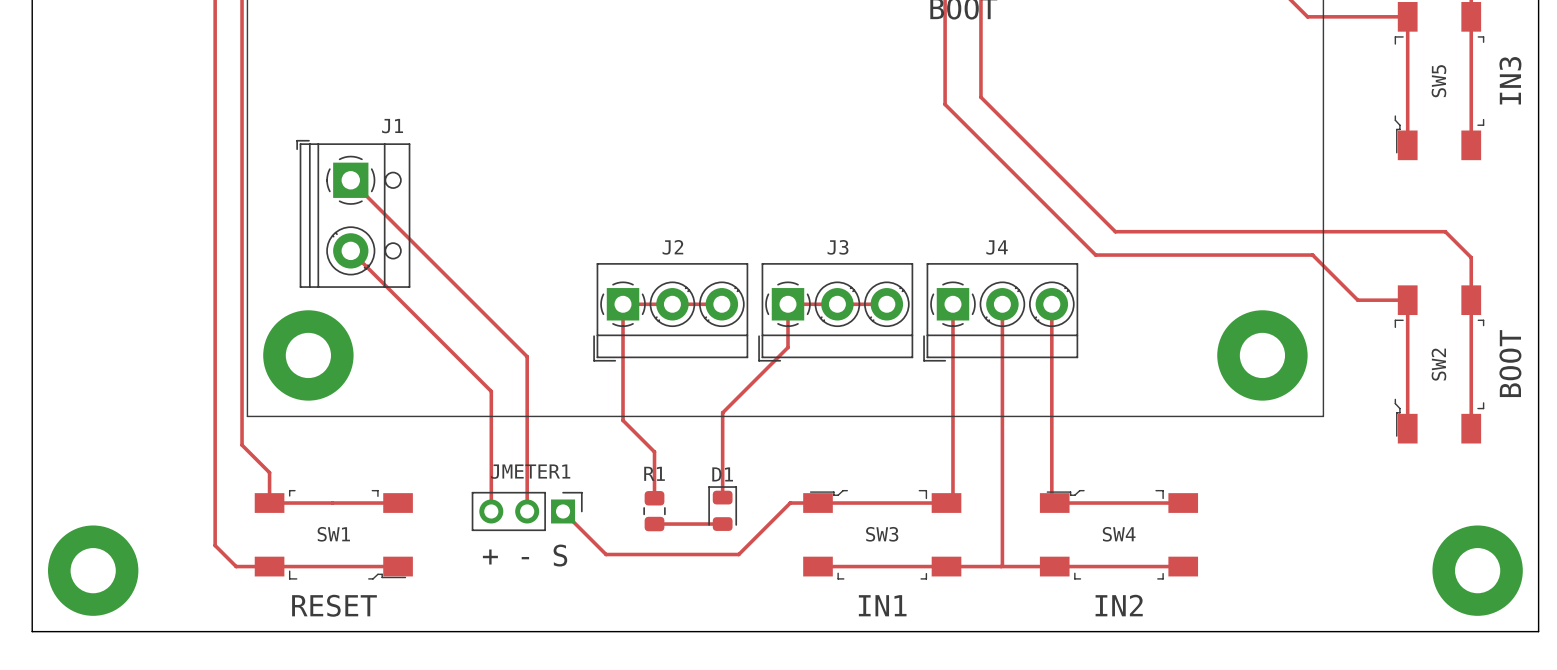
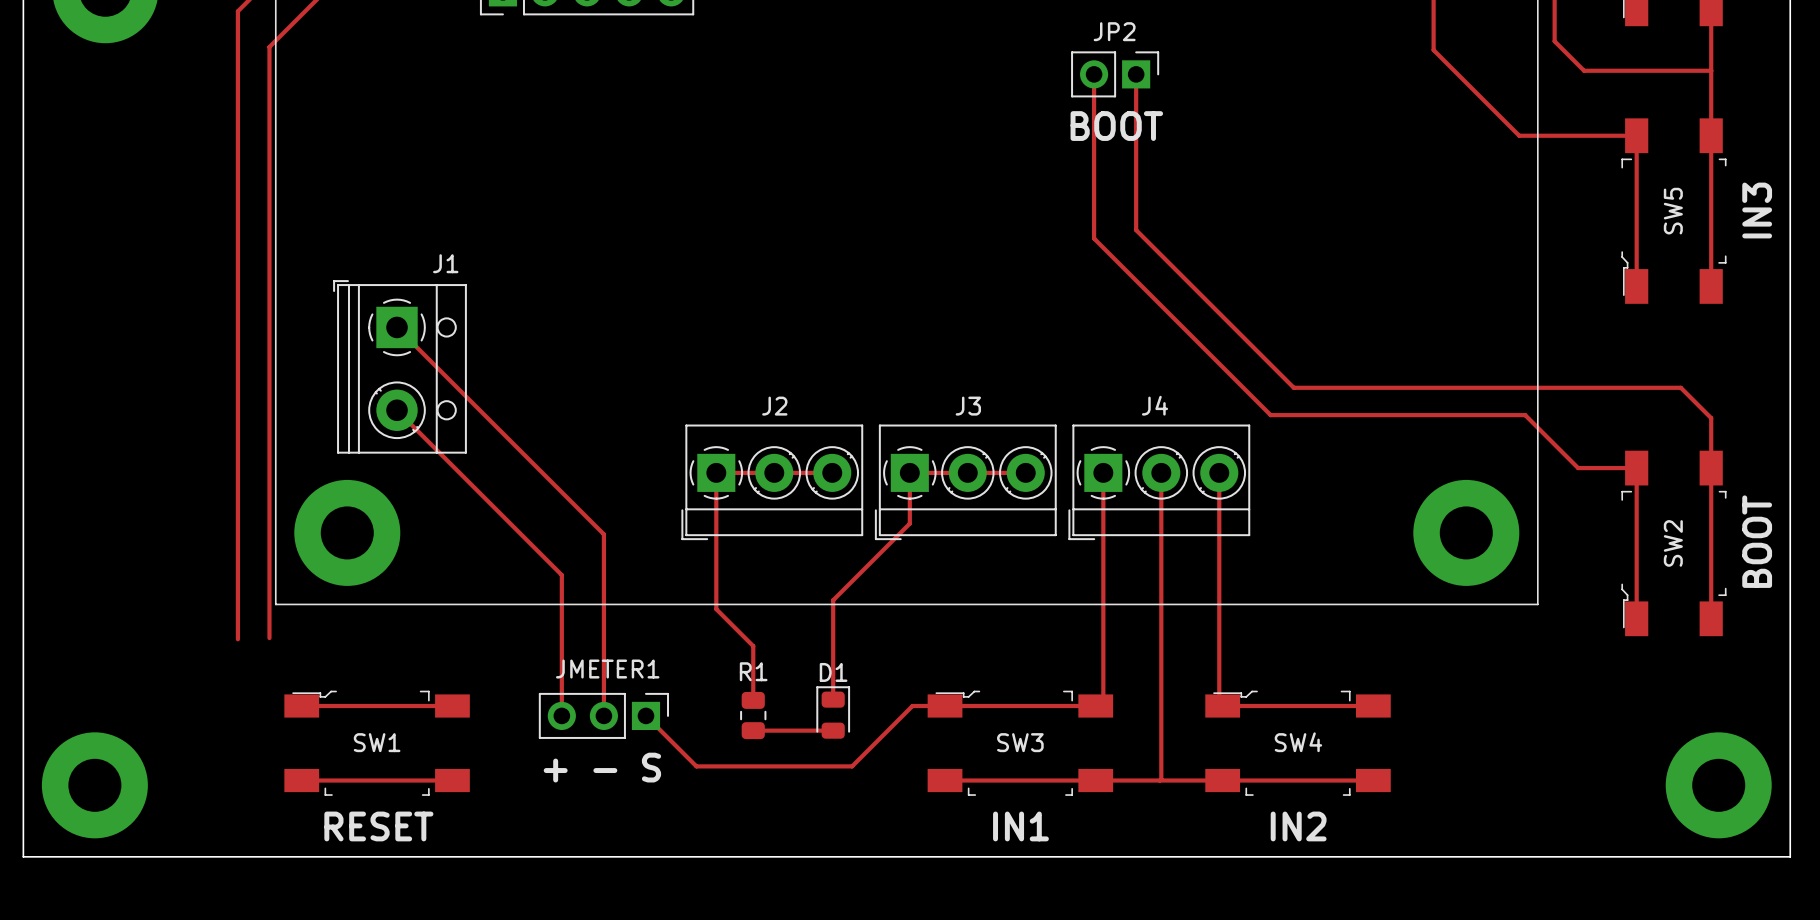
track: (242, 445) (269, 472) (269, 503) -> none
track: (215, 446) (215, 545) (236, 566) (269, 566) -> none
SW1 rotation: 0° (333, 534) -> 180° (377, 743)

